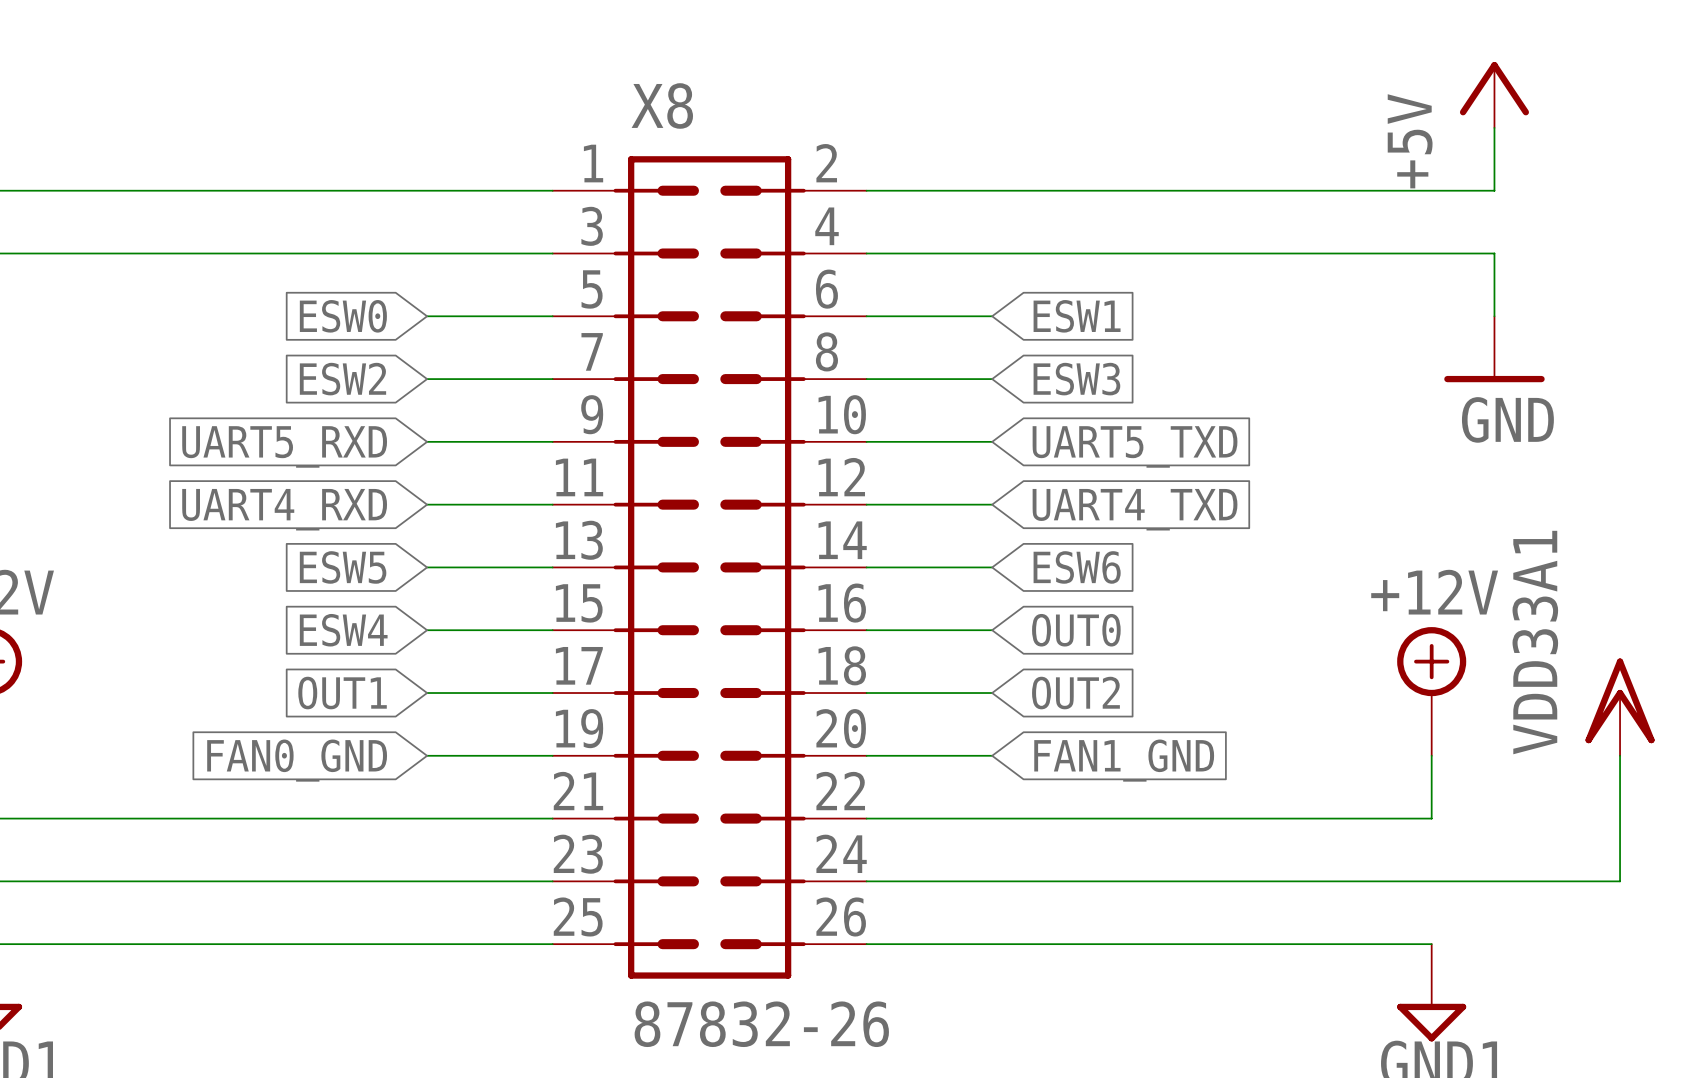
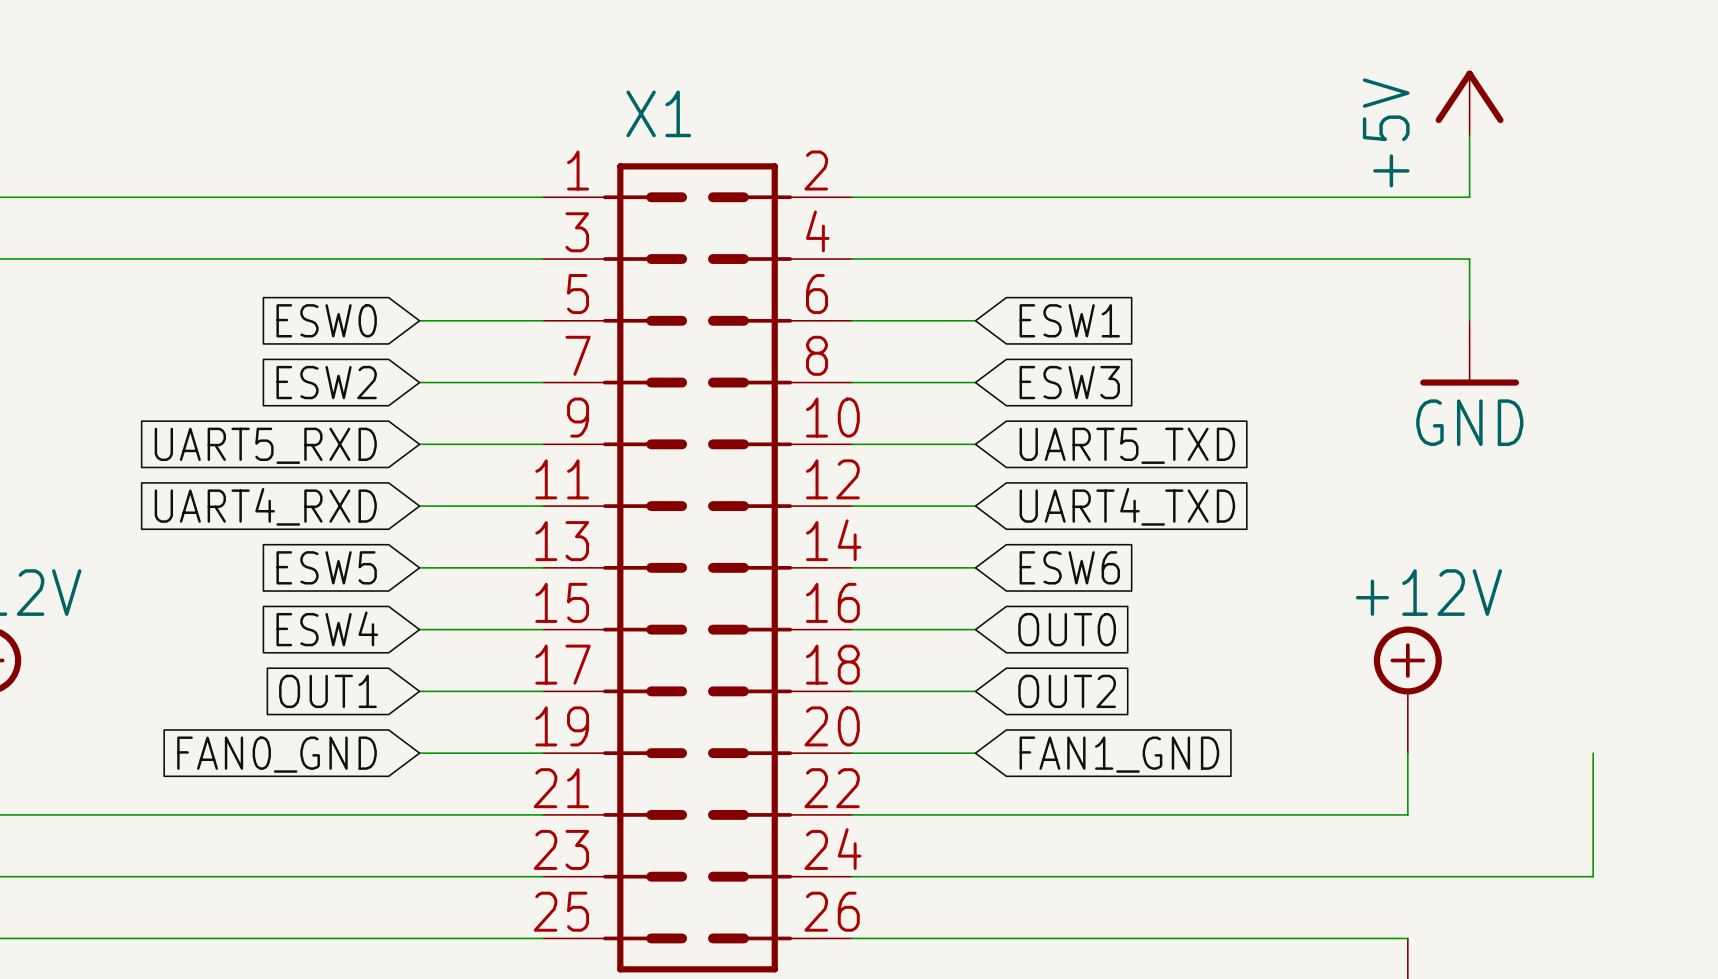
X8 name: X8 (662, 105) -> X1 (658, 113)
power symbol: VDD33A1 (1620, 707) -> none

